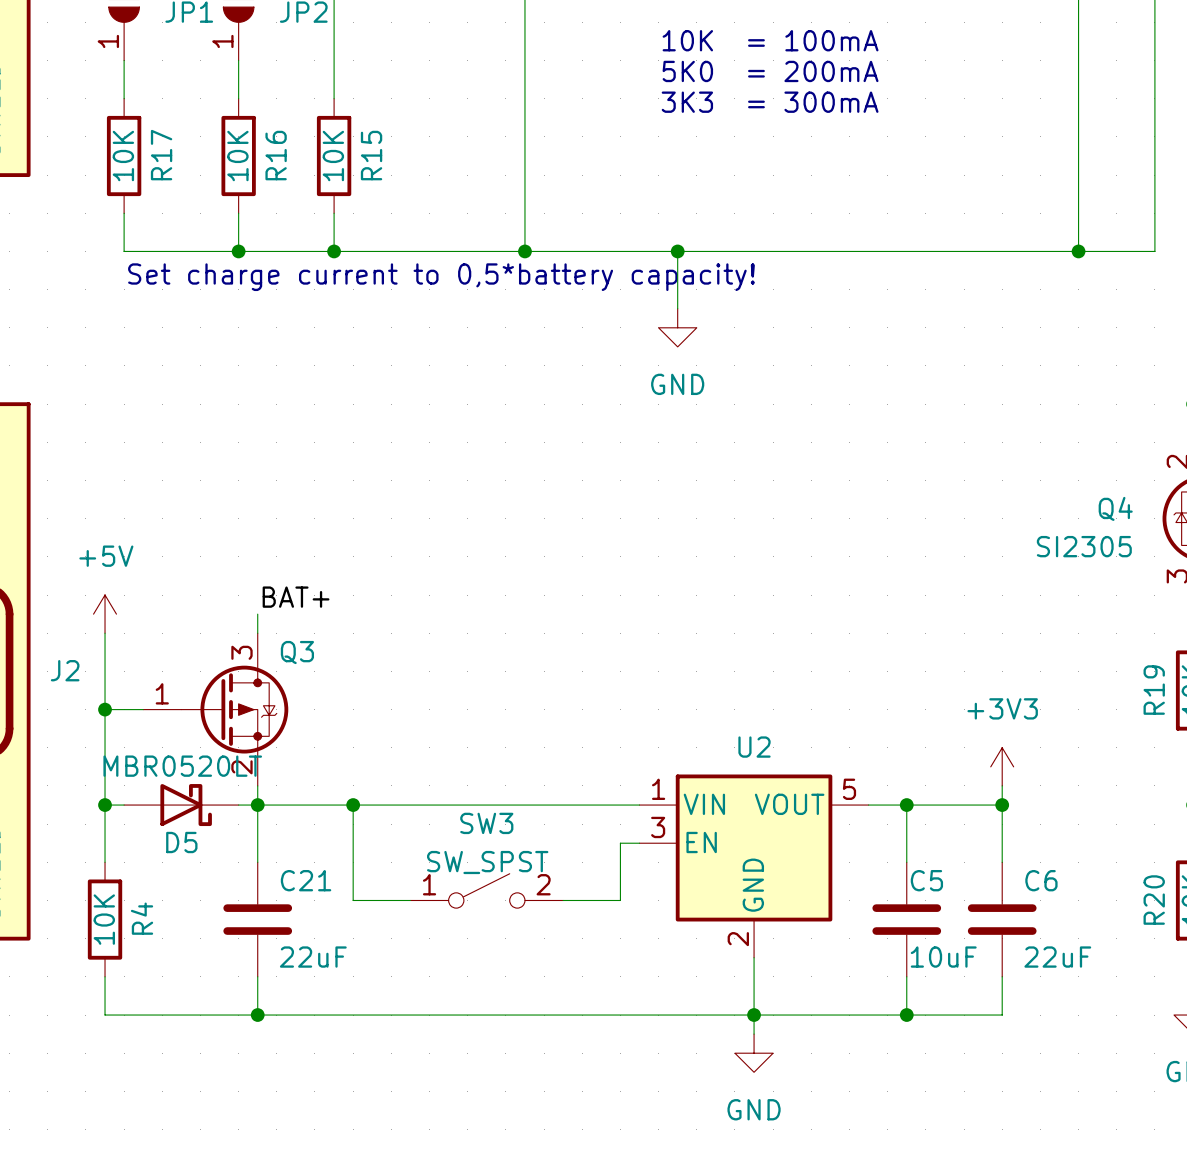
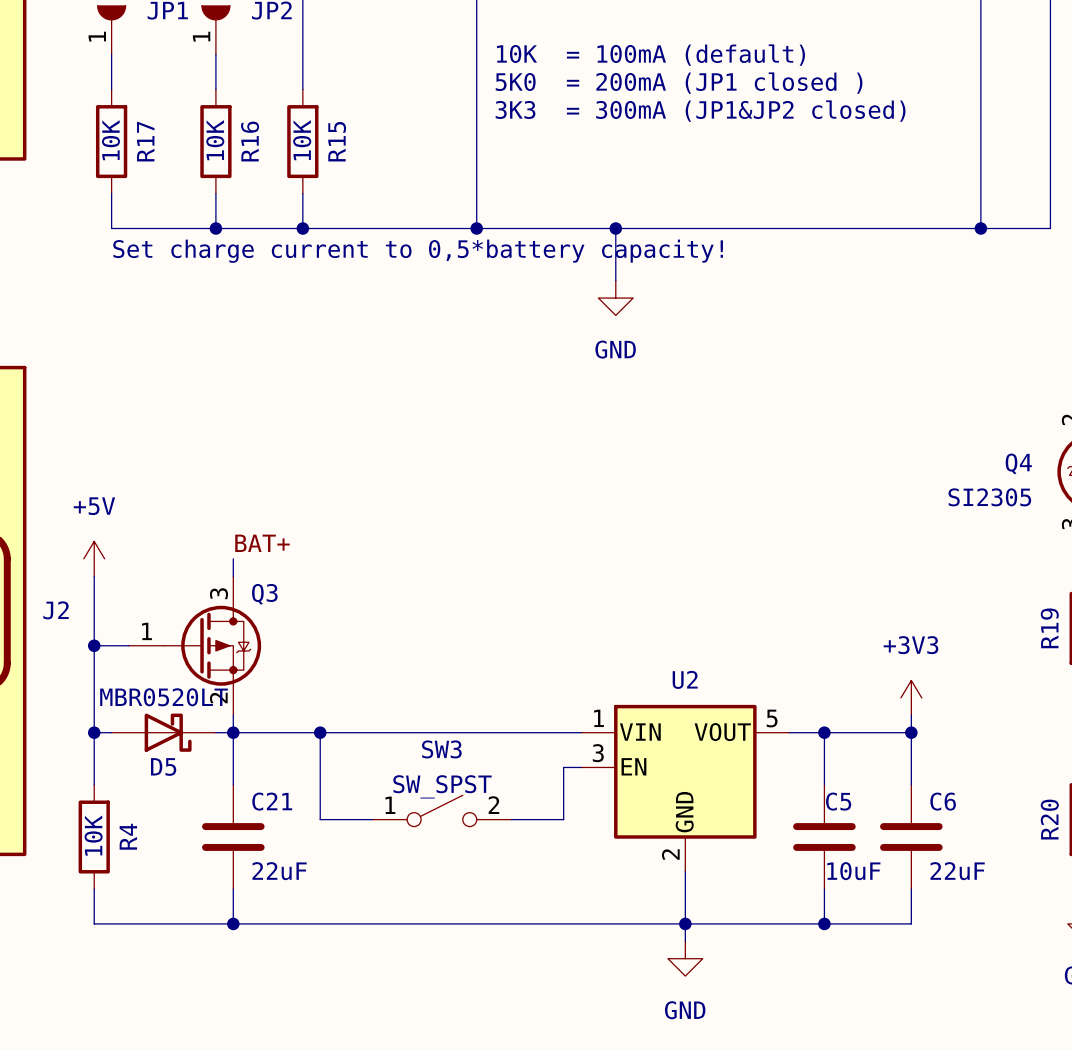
text: 10K = 100mA (770, 40) -> 10K = 100mA (default) (650, 55)
text: 5K0 = 200mA (770, 71) -> 5K0 = 200mA (JP1 closed ) (679, 83)
text: 3K3 = 300mA (770, 102) -> none
text: none -> 3K3 = 300mA (JP1&JP2 closed) (700, 111)

